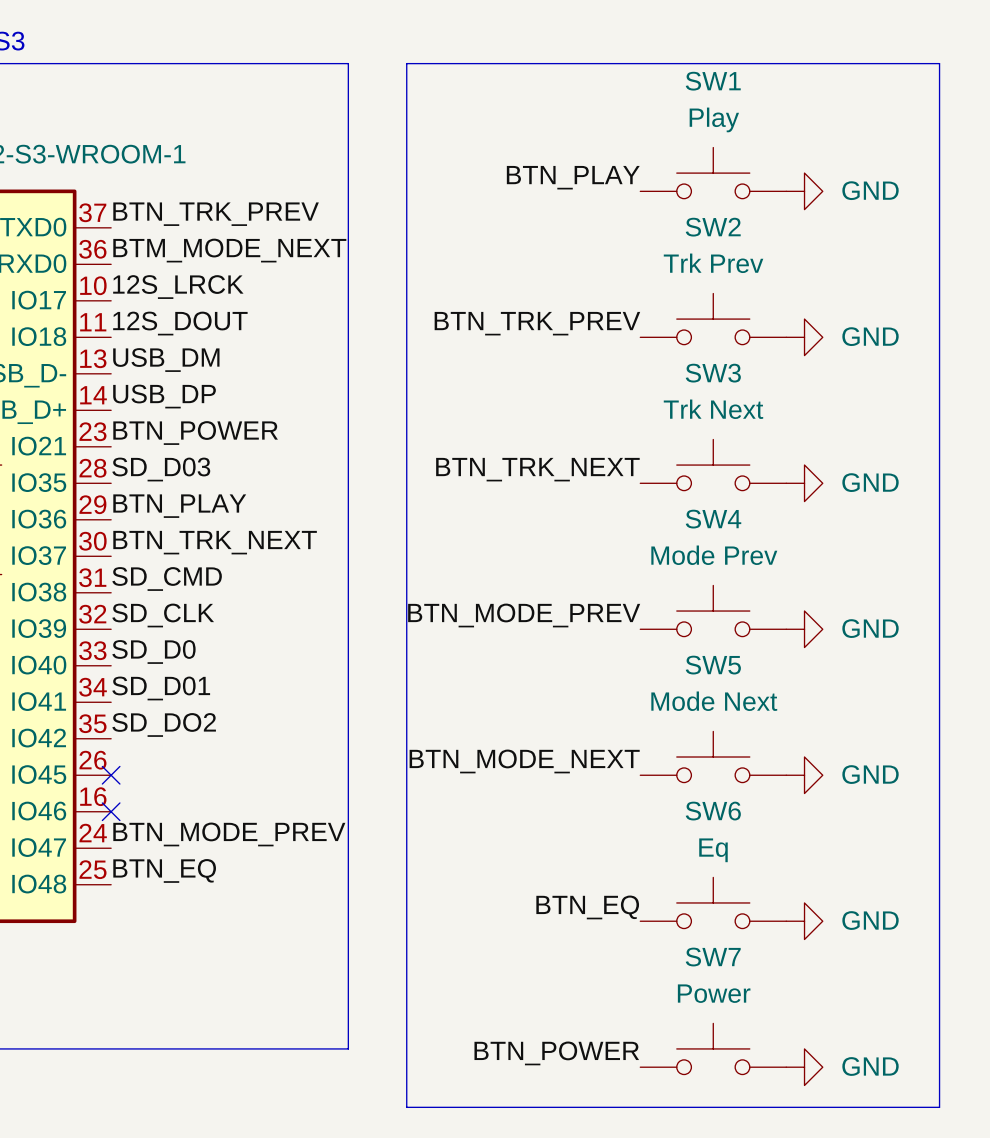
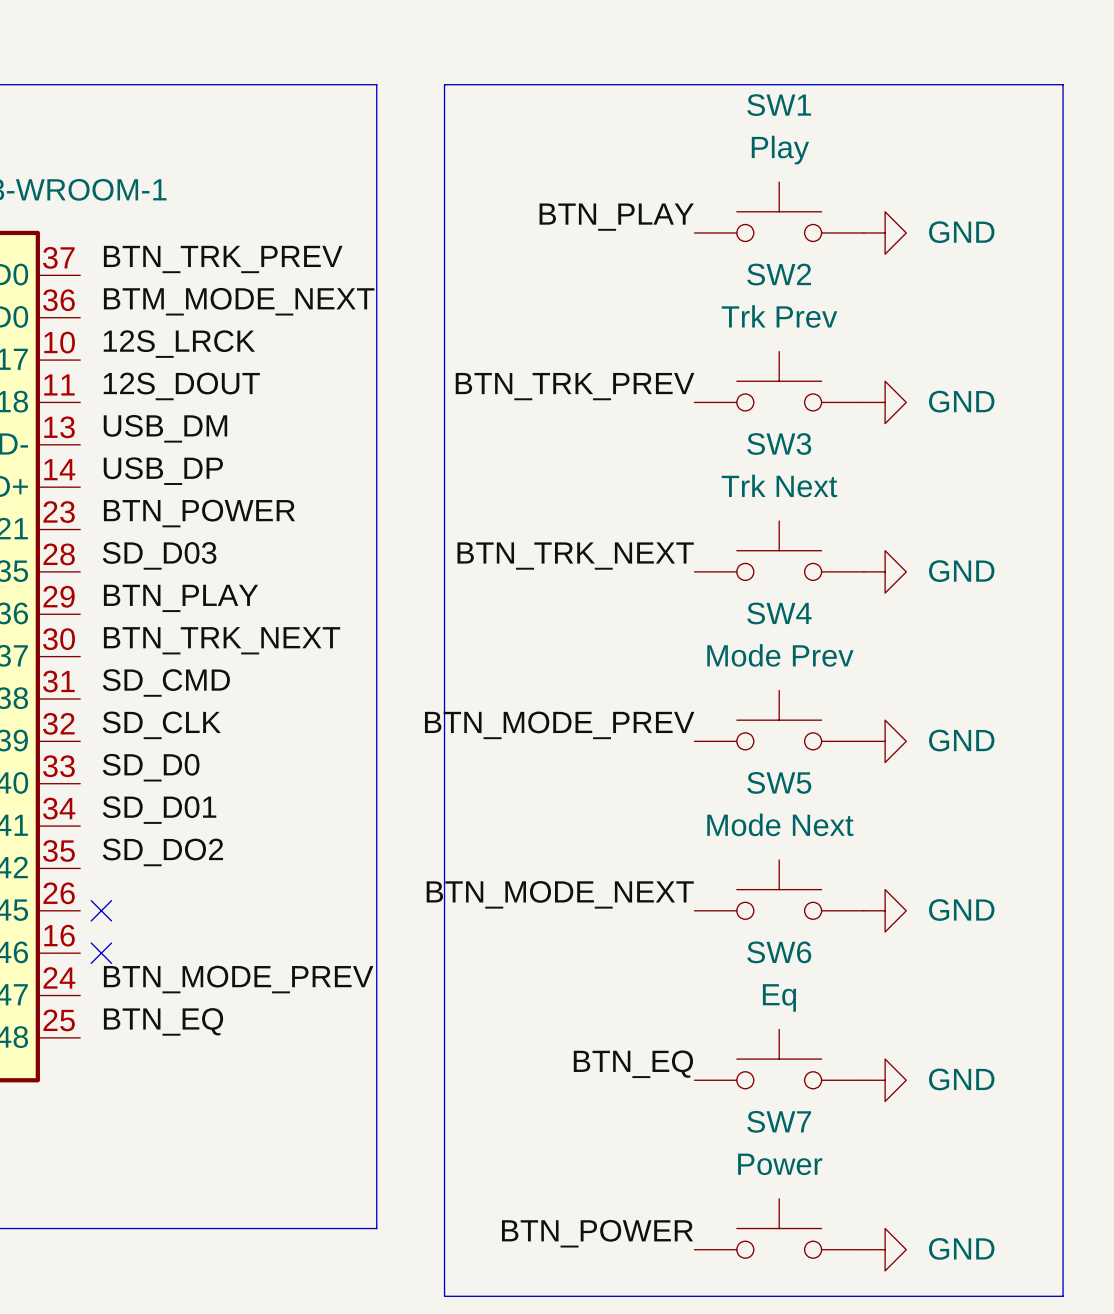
line: (348, 63) (348, 1048) -> (355, 84) (376, 84) (376, 1228) (355, 1228)
line: (424, 63) (406, 63) (406, 1107) (424, 1107) -> (444, 84) (444, 1296)
line: (939, 63) (939, 1107) -> (1041, 84) (1063, 84) (1063, 1296) (1041, 1296)
label position: BTN_TRK_PREV (216, 214) -> BTN_TRK_PREV (223, 259)
label position: BTM_MODE_NEXT (229, 250) -> BTM_MODE_NEXT (239, 301)
label position: 12S_LRCK (178, 287) -> 12S_LRCK (179, 344)
label position: 12S_DOUT (180, 323) -> 12S_DOUT (181, 386)
label position: USB_DM (166, 360) -> USB_DM (165, 428)
label position: USB_DP (164, 396) -> USB_DP (163, 471)
label position: BTN_POWER (195, 433) -> BTN_POWER (199, 513)
label position: SD_D03 (161, 469) -> SD_D03 (159, 555)
label position: BTN_PLAY (179, 506) -> BTN_PLAY (181, 598)
label position: BTN_TRK_NEXT (215, 542) -> BTN_TRK_NEXT (222, 640)
label position: SD_CMD (167, 578) -> SD_CMD (166, 682)
label position: SD_CLK (163, 615) -> SD_CLK (161, 725)
label position: SD_D0 (153, 651) -> SD_D0 (151, 767)
label position: SD_D01 (161, 688) -> SD_D01 (159, 810)
label position: SD_DO2 (164, 724) -> SD_DO2 (162, 852)
no-connect mark position: (111, 775) -> (101, 910)
no-connect mark position: (111, 811) -> (101, 953)
label position: BTN_MODE_PREV (229, 834) -> BTN_MODE_PREV (238, 979)
label position: BTN_EQ (164, 870) -> BTN_EQ (163, 1021)

